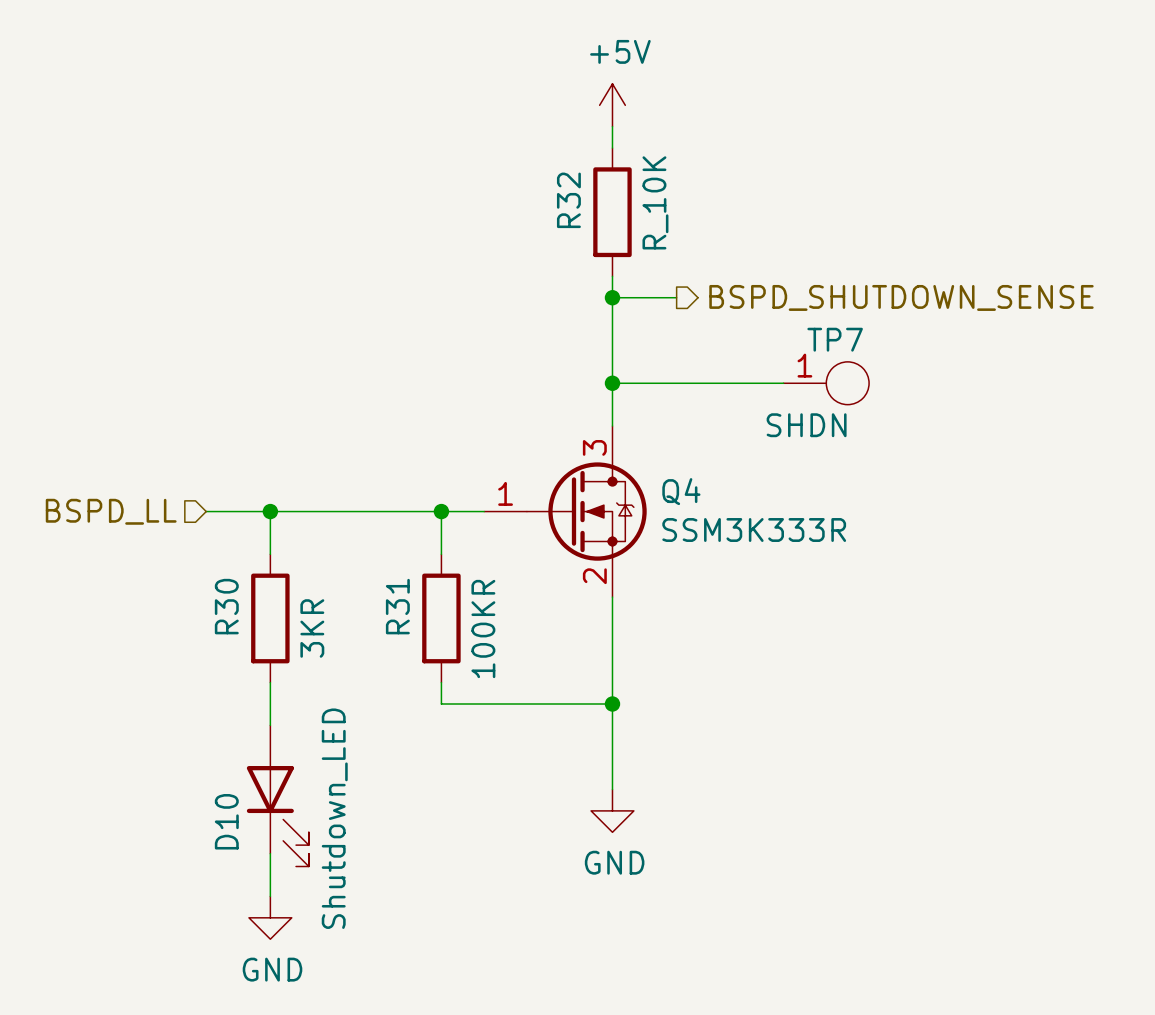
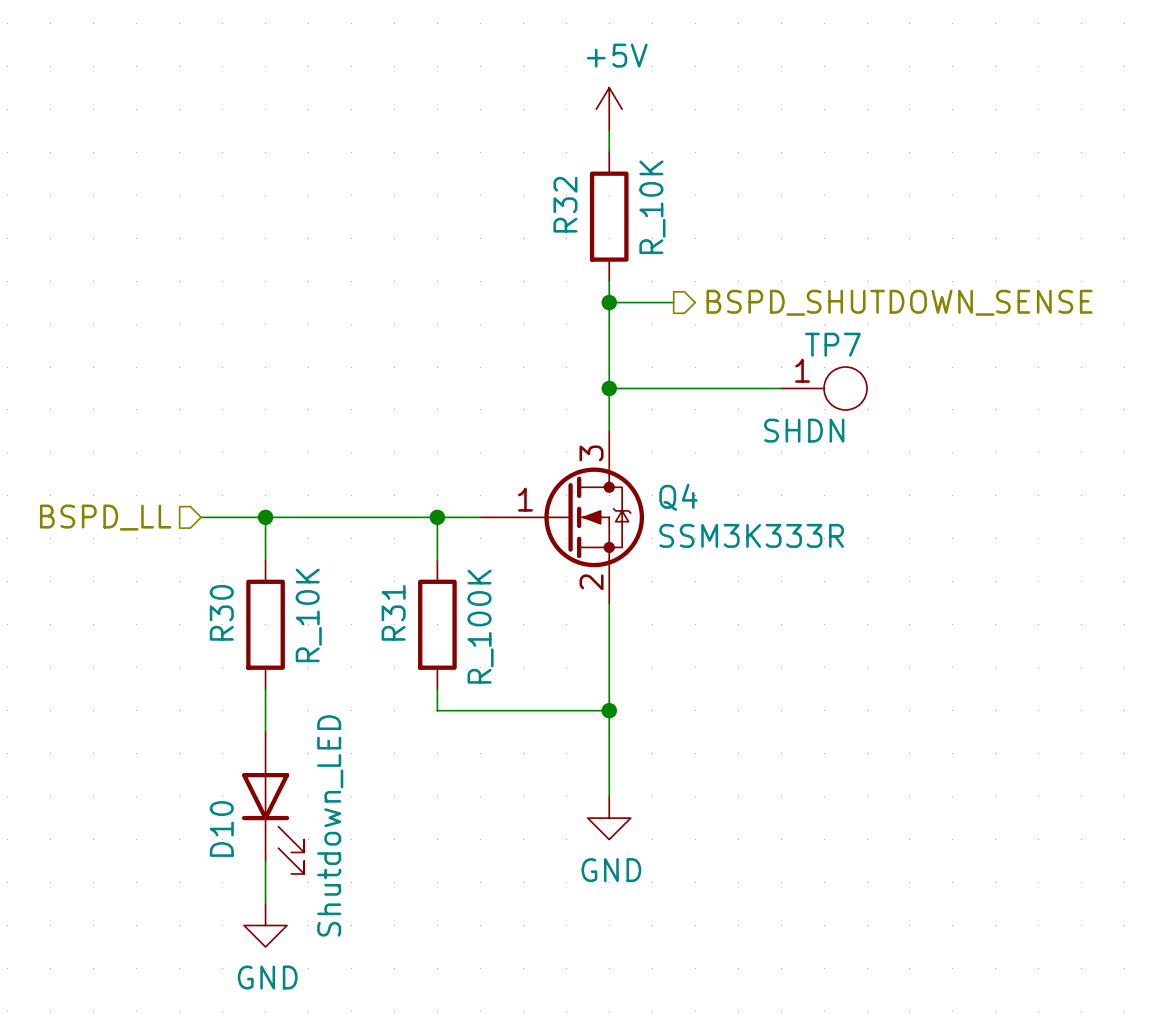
Q4 symbol: [484, 426, 647, 598] -> [480, 431, 645, 604]
R30 value: 3KR (312, 628) -> R_10K (308, 615)
R31 value: 100KR (483, 629) -> R_100K (480, 626)

